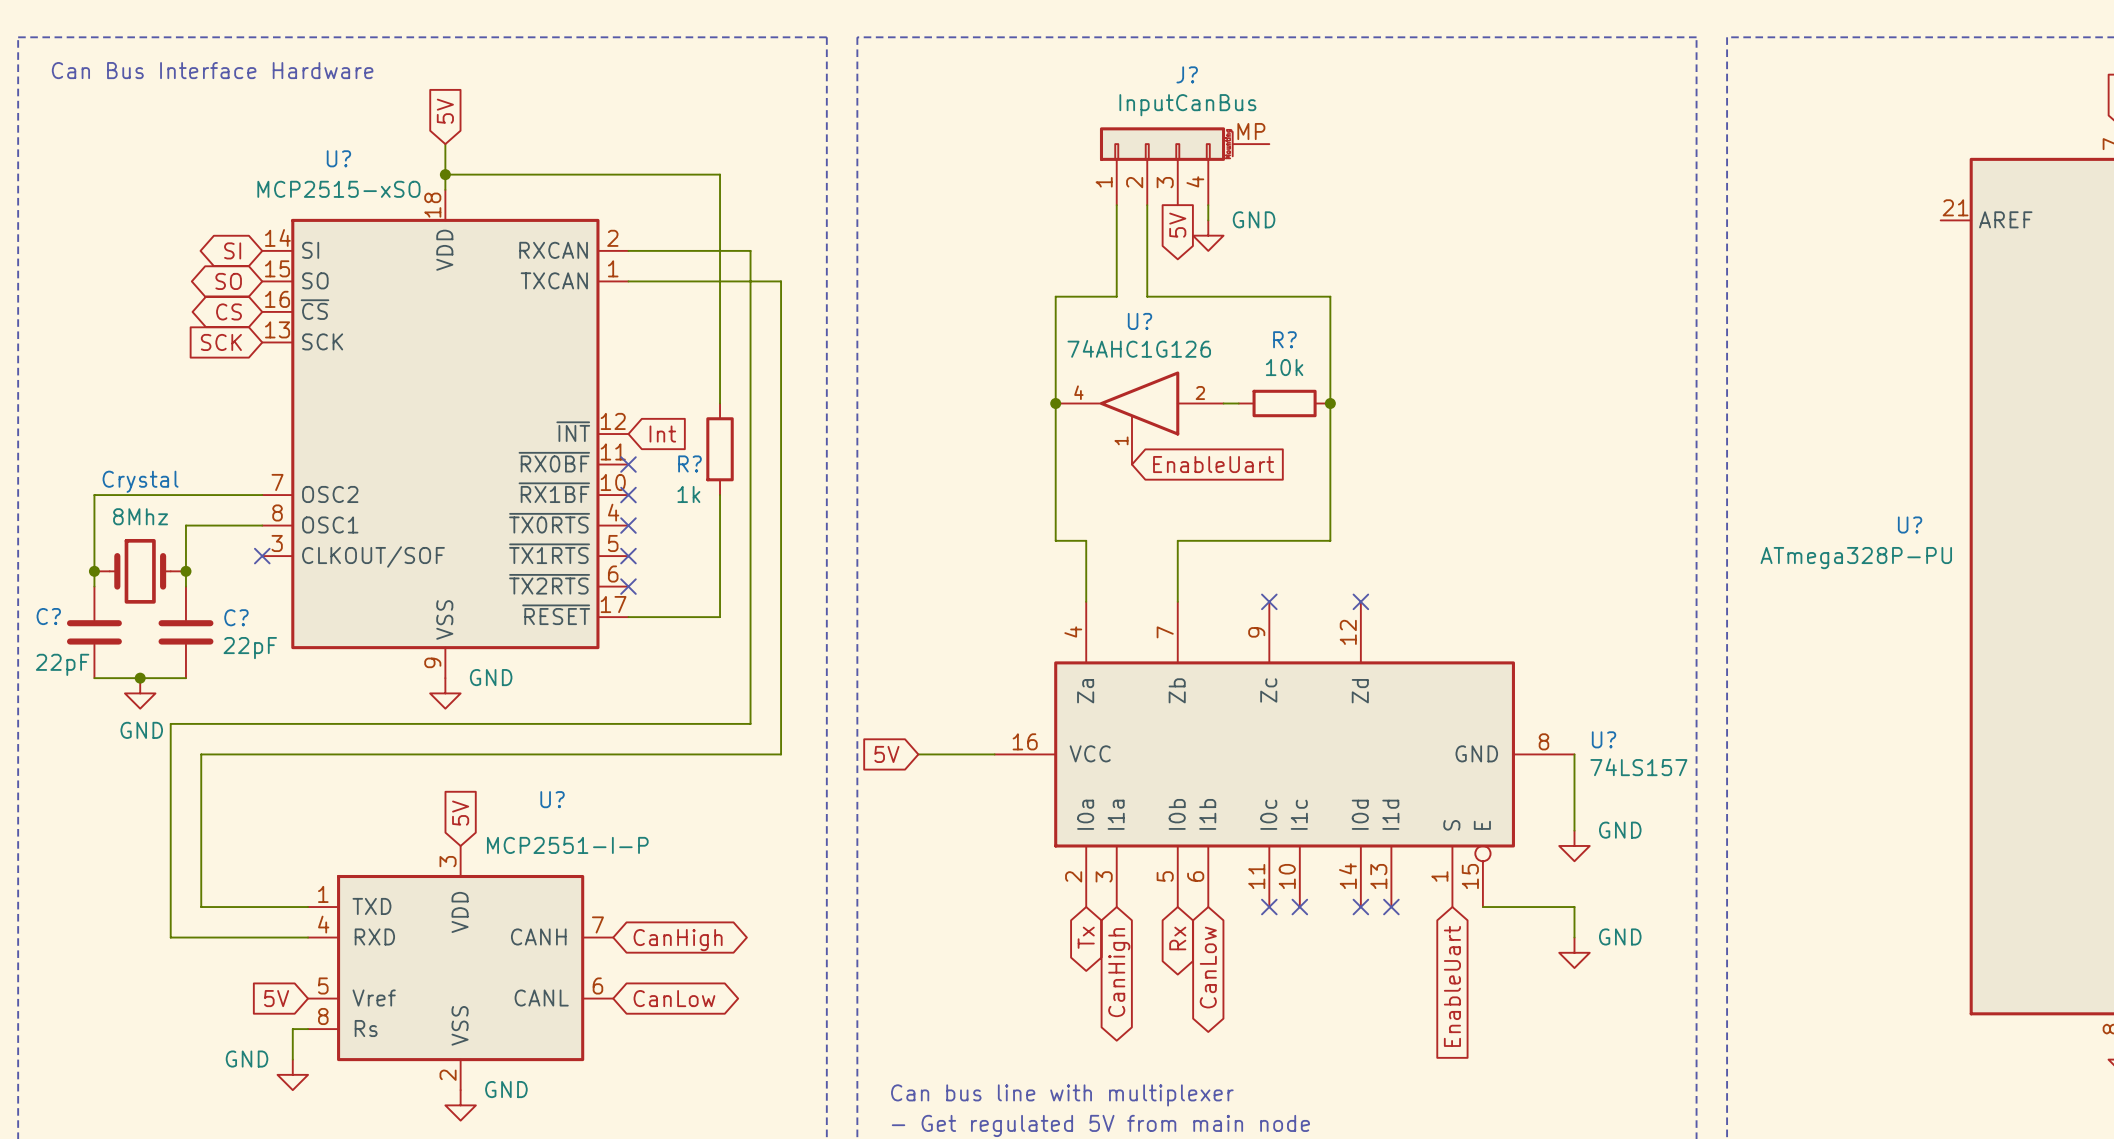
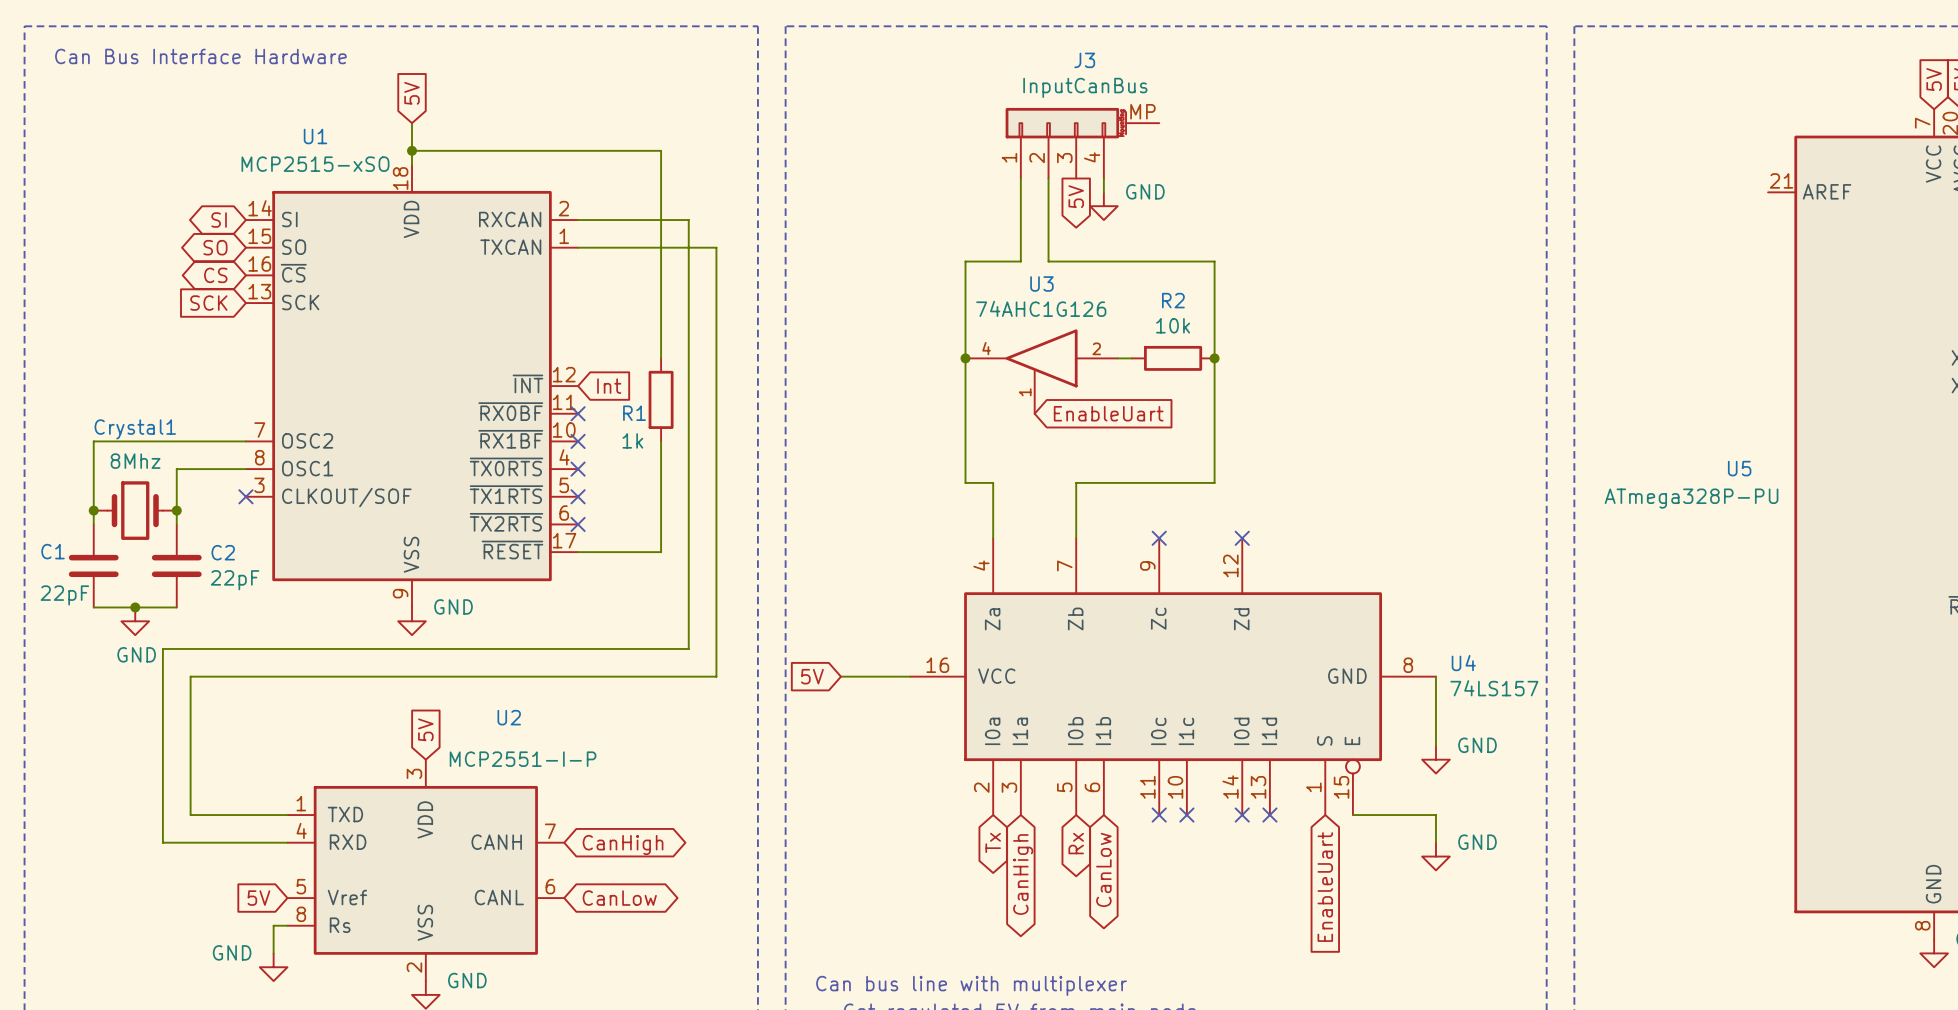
J? name: J? (1187, 74) -> J3 (1084, 60)
U? name: U? (338, 158) -> U1 (315, 136)
U? name: U? (1139, 321) -> U3 (1041, 283)
R? name: R? (1284, 339) -> R2 (1173, 300)
R? name: R? (689, 463) -> R1 (634, 413)
Crystal name: Crystal (140, 481) -> Crystal1 (135, 429)
U? name: U? (1910, 524) -> U5 (1739, 468)
C? name: C? (48, 616) -> C1 (53, 551)
C? name: C? (236, 617) -> C2 (223, 552)
U? name: U? (1604, 739) -> U4 (1463, 663)
U? name: U? (552, 799) -> U2 (509, 717)

